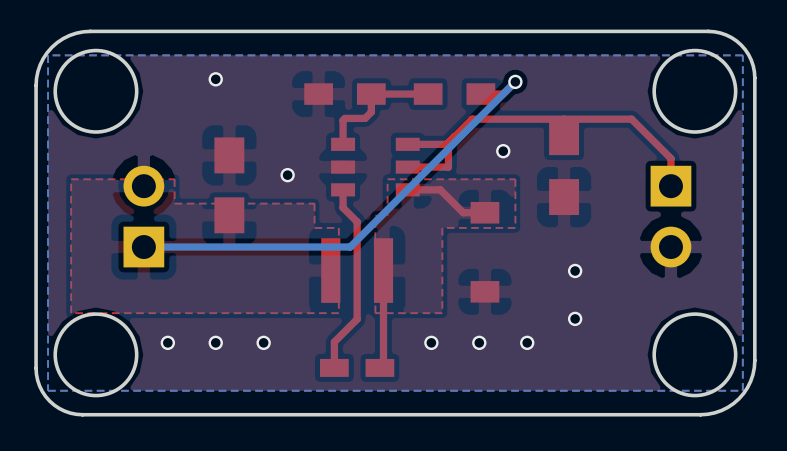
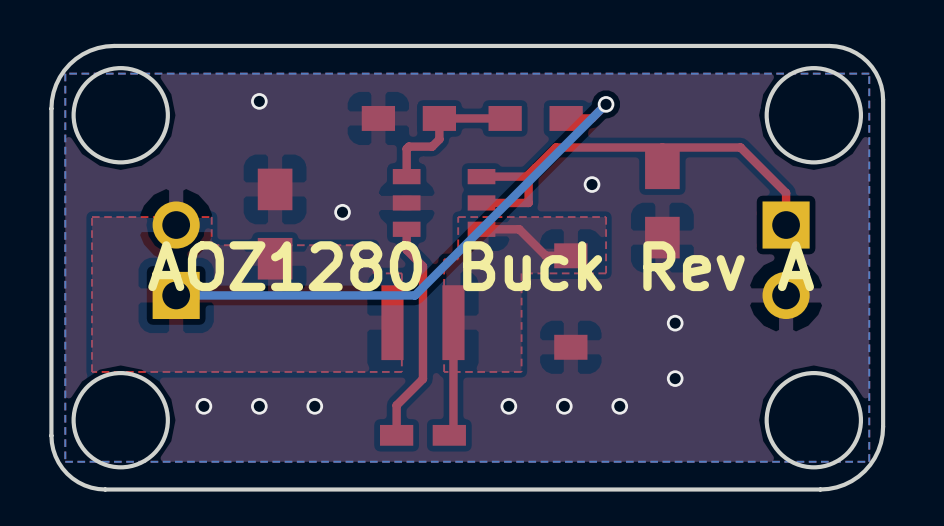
text: none -> AOZ1280 Buck Rev A (481, 266)

